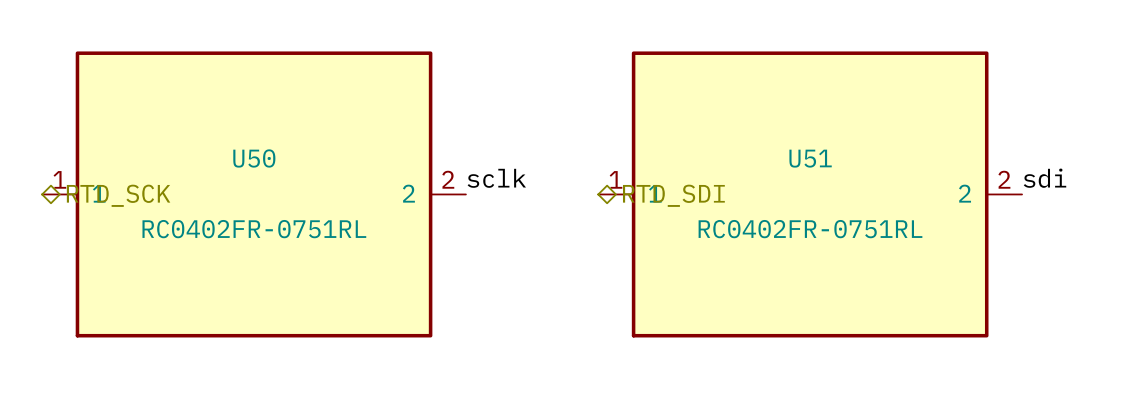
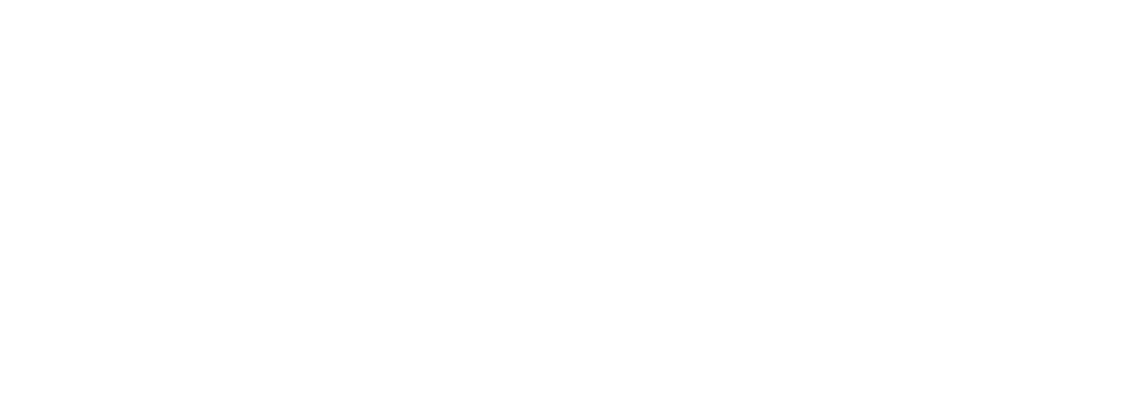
label: sclk (496, 178) -> none
label: sdi (1044, 178) -> none
U50: RC0402FR-0751RL (254, 194) -> none
U51: RC0402FR-0751RL (810, 194) -> none
hierarchical label: RTD_SCK (118, 195) -> none
hierarchical label: RTD_SDI (673, 195) -> none

